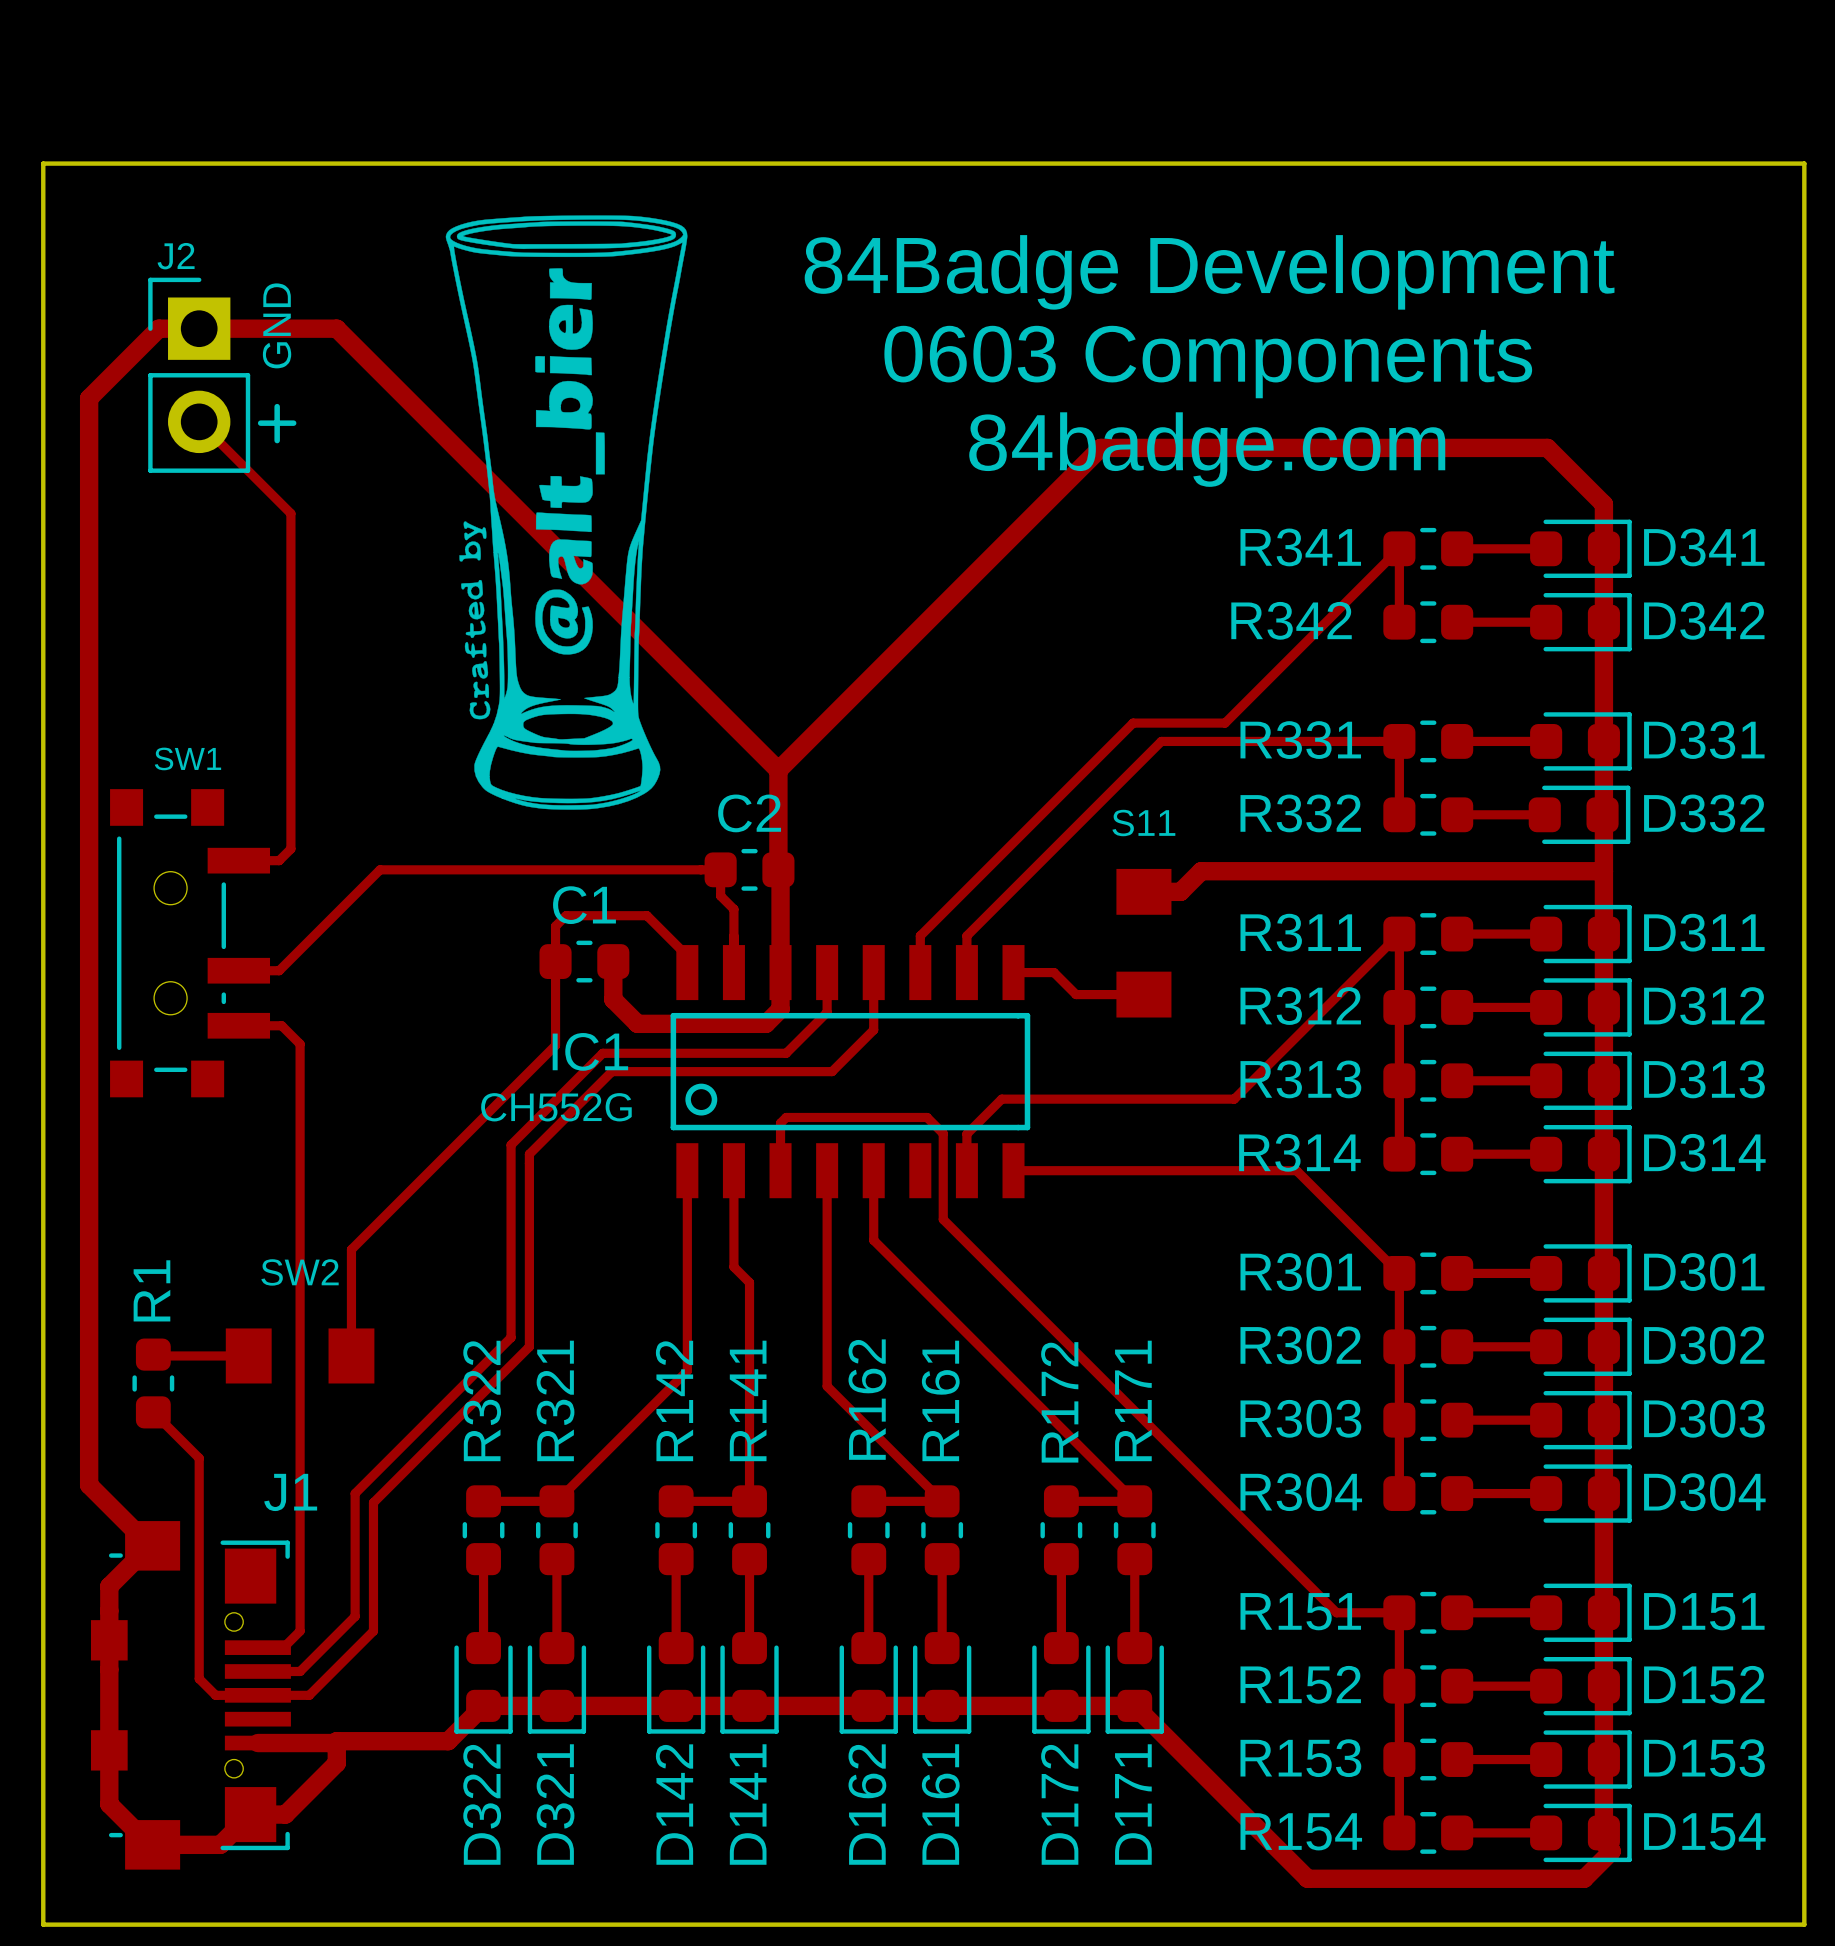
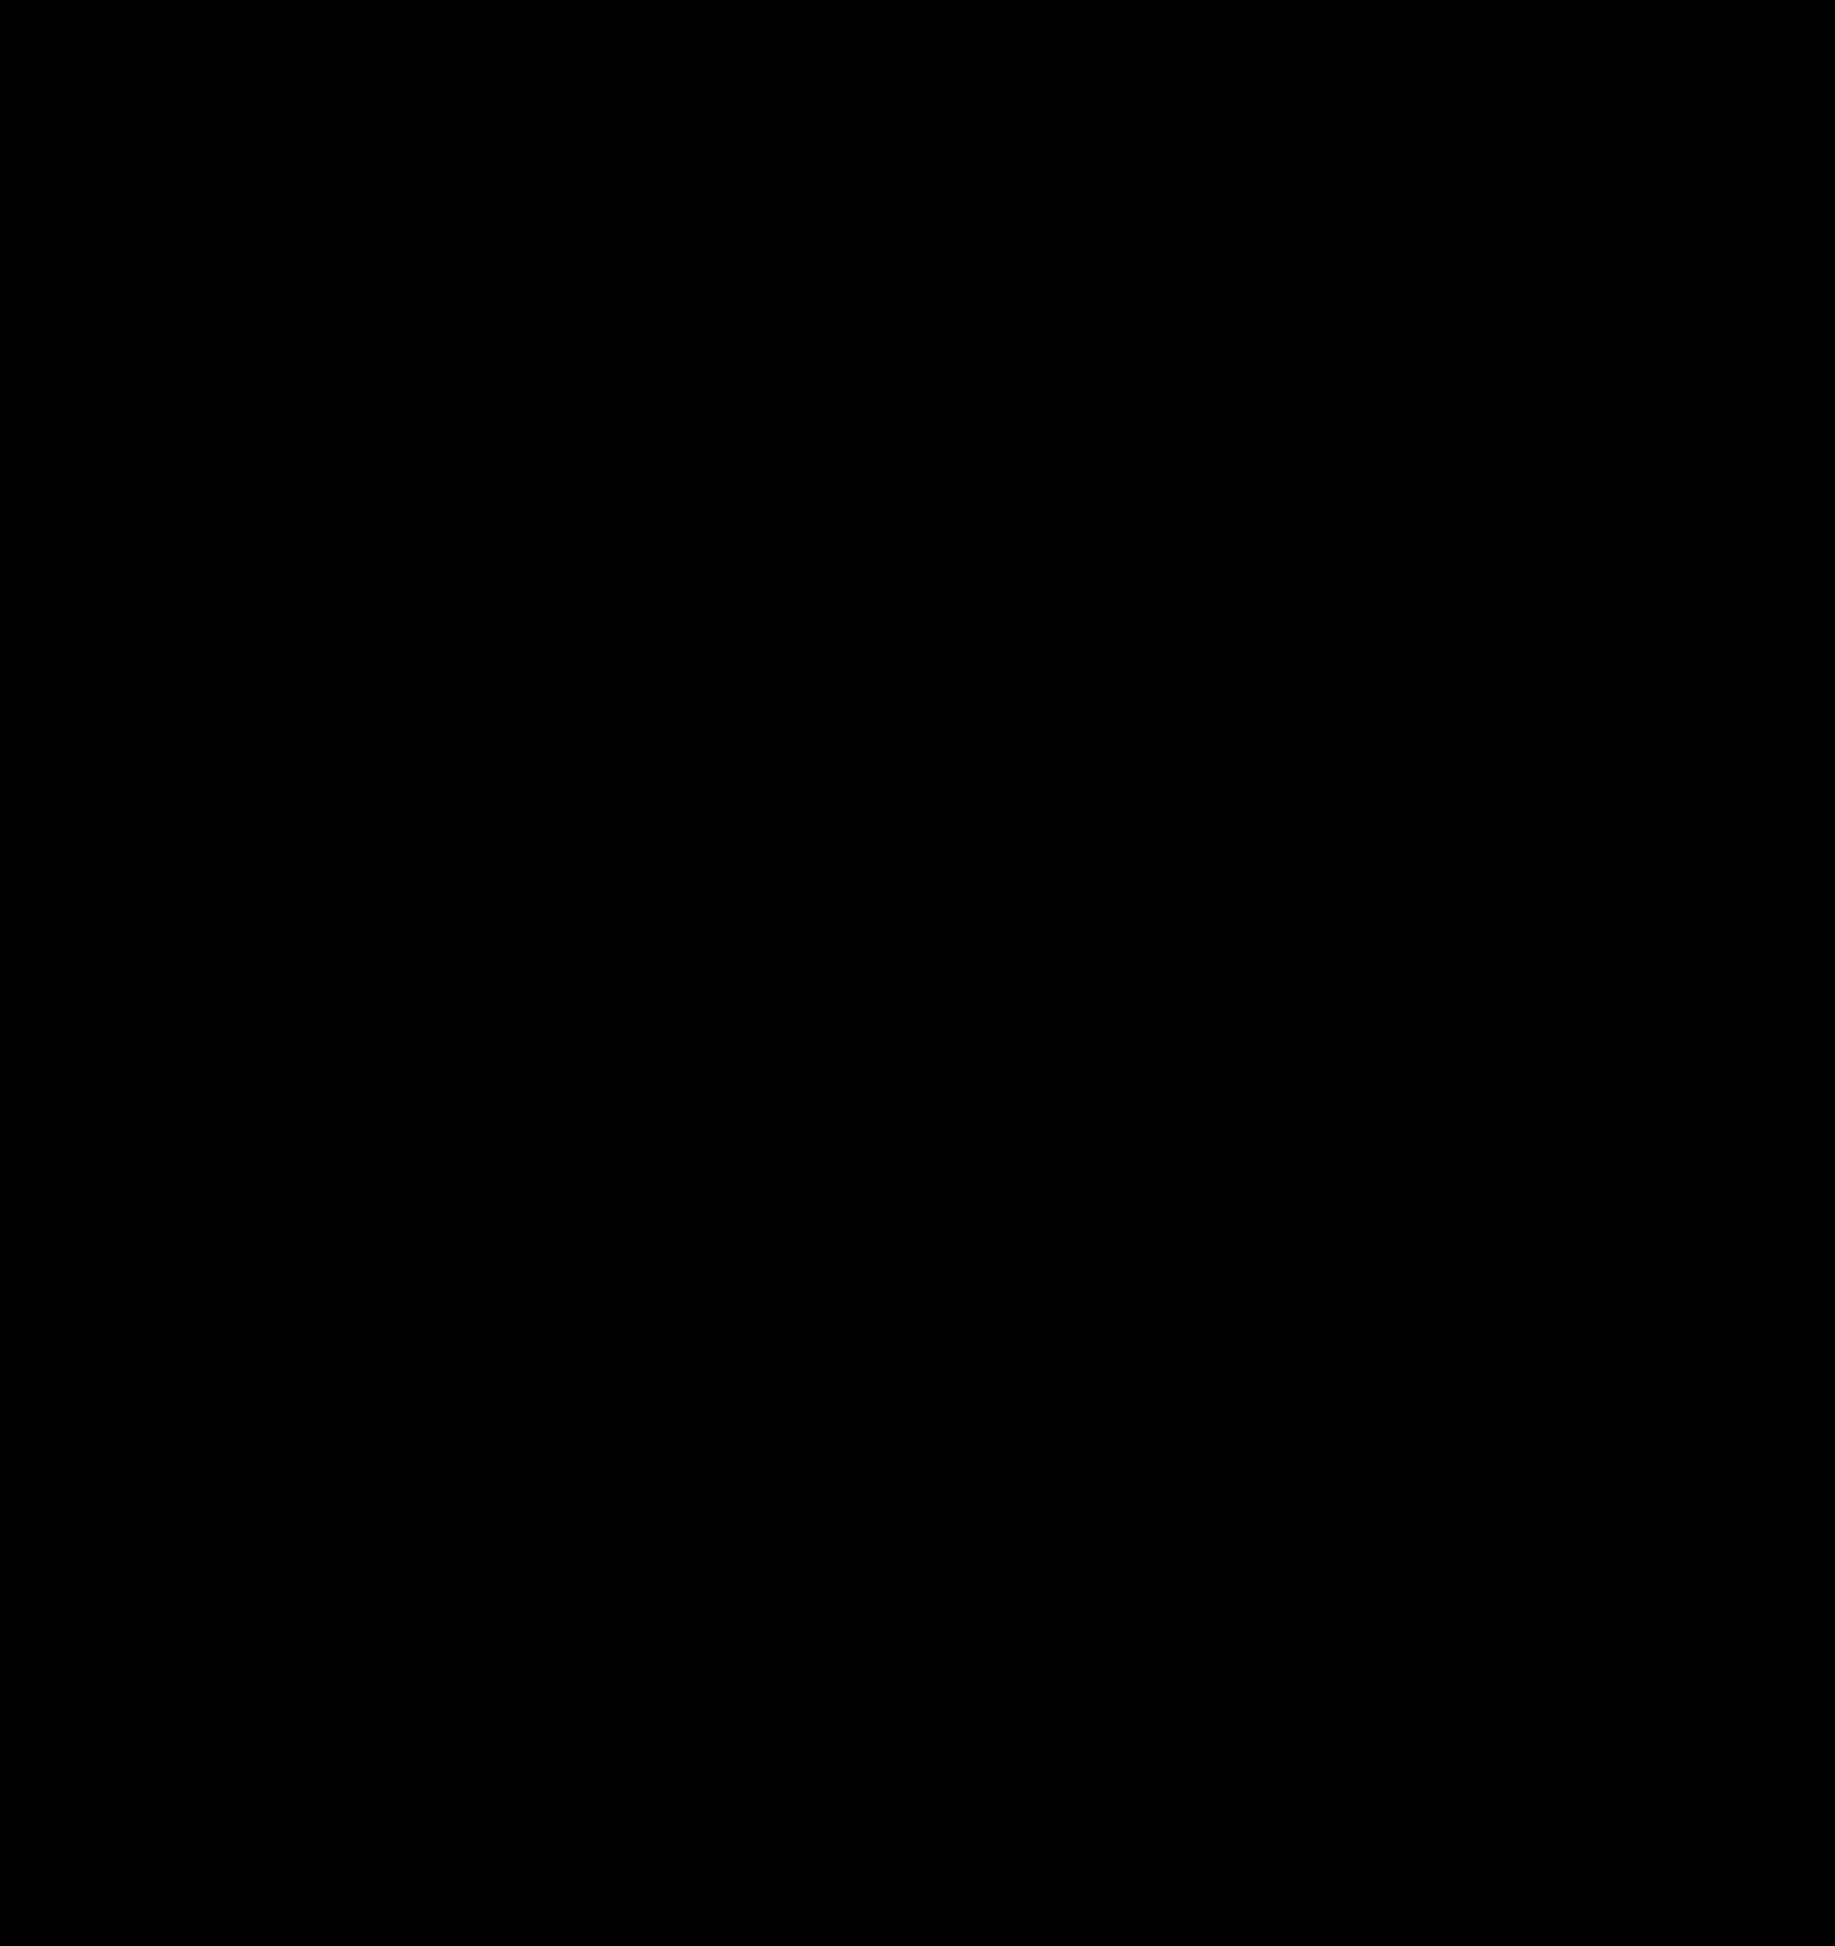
board edge: (43, 163) (1804, 163) (1804, 1924) (43, 1924) (43, 163) -> none
drawing: [445, 215, 688, 810] -> none
text: 84Badge Development (1209, 272) -> none
text: 0603 Components (1208, 362) -> none
J2: (222, 375) -> none
top track: (199, 421) (290, 513) (290, 848) (279, 860) (238, 860) -> none
text: 84badge.com (1207, 449) -> none
R341: (1428, 548) -> none
top track: (1457, 548) (1546, 548) -> none
D341: (1580, 548) -> none
top track: (1399, 622) (1399, 548) (1225, 723) (1133, 723) (920, 935) (920, 972) -> none
R342: (1428, 622) -> none
top track: (1457, 622) (1546, 622) -> none
D342: (1580, 622) -> none
R331: (1428, 741) -> none
top track: (1457, 741) (1546, 741) -> none
D331: (1580, 741) -> none
top track: (778, 770) (780, 1009) (765, 1023) (637, 1023) (613, 999) (613, 961) -> none
top track: (778, 770) (336, 328) (158, 328) (89, 398) (89, 1485) (149, 1545) -> none
top track: (778, 770) (1100, 447) (1547, 447) (1603, 504) (1603, 1843) (1611, 1851) (1584, 1878) (1307, 1878) (1134, 1705) (483, 1705) (448, 1741) (336, 1741) -> none
top track: (1399, 814) (1399, 741) (1161, 741) (966, 935) (966, 972) -> none
R332: (1428, 814) -> none
top track: (1457, 814) (1544, 814) -> none
D332: (1579, 814) -> none
C2: (749, 869) -> none
top track: (1603, 871) (1201, 871) (1180, 891) (1143, 891) -> none
R311: (1428, 934) -> none
top track: (1457, 934) (1546, 934) -> none
D311: (1580, 934) -> none
SW1: (190, 943) -> none
S11: (1143, 943) -> none
C1: (584, 961) -> none
top track: (238, 970) (279, 970) (380, 869) (720, 869) (720, 895) (733, 909) (733, 972) -> none
top track: (687, 972) (687, 956) (646, 915) (566, 915) (555, 926) (555, 1045) (351, 1249) (351, 1355) -> none
top track: (827, 972) (827, 1012) (786, 1053) (602, 1053) (511, 1145) (511, 1337) (355, 1493) (355, 1616) (300, 1671) (257, 1671) -> none
top track: (873, 972) (873, 1029) (832, 1071) (611, 1071) (529, 1154) (529, 1346) (373, 1502) (373, 1631) (309, 1695) (215, 1695) (199, 1678) (199, 1458) (153, 1412) -> none
top track: (1013, 972) (1054, 972) (1076, 994) (1143, 994) -> none
R312: (1428, 1007) -> none
top track: (1457, 1007) (1546, 1007) -> none
D312: (1580, 1007) -> none
top track: (238, 1025) (281, 1025) (300, 1044) (300, 1631) (283, 1647) (257, 1647) -> none
IC1: (850, 1071) -> none
R313: (1428, 1080) -> none
top track: (1457, 1080) (1546, 1080) -> none
D313: (1580, 1080) -> none
top track: (1399, 1154) (1399, 934) (1234, 1099) (1001, 1099) (966, 1134) (966, 1170) -> none
R314: (1428, 1154) -> none
top track: (1457, 1154) (1546, 1154) -> none
D314: (1580, 1154) -> none
top track: (687, 1170) (687, 1370) (556, 1501) (483, 1501) -> none
top track: (733, 1170) (733, 1266) (749, 1282) (749, 1501) (676, 1501) -> none
top track: (780, 1170) (780, 1123) (786, 1117) (927, 1117) (943, 1133) (943, 1219) (1336, 1612) (1399, 1612) (1399, 1832) -> none
top track: (827, 1170) (827, 1386) (942, 1501) (868, 1501) -> none
top track: (873, 1170) (873, 1240) (1134, 1501) (1061, 1501) -> none
top track: (1013, 1170) (1296, 1170) (1399, 1273) (1399, 1493) -> none
R301: (1428, 1273) -> none
top track: (1457, 1273) (1546, 1273) -> none
D301: (1580, 1273) -> none
R302: (1428, 1346) -> none
top track: (1457, 1346) (1546, 1346) -> none
D302: (1580, 1346) -> none
top track: (153, 1354) (248, 1355) -> none
SW2: (300, 1355) -> none
R1: (153, 1383) -> none
R303: (1428, 1420) -> none
top track: (1457, 1420) (1546, 1420) -> none
D303: (1580, 1420) -> none
R304: (1428, 1493) -> none
top track: (1457, 1493) (1546, 1493) -> none
D304: (1580, 1493) -> none
R322: (483, 1530) -> none
R321: (556, 1530) -> none
R142: (676, 1530) -> none
R141: (749, 1530) -> none
R162: (868, 1530) -> none
R161: (942, 1530) -> none
R172: (1061, 1530) -> none
R171: (1134, 1530) -> none
top track: (149, 1545) (109, 1586) (109, 1804) (149, 1844) (220, 1844) (250, 1814) (285, 1814) (336, 1763) (336, 1741) -> none
top track: (483, 1559) (483, 1648) -> none
top track: (556, 1559) (556, 1648) -> none
top track: (676, 1559) (676, 1648) -> none
top track: (749, 1559) (749, 1648) -> none
top track: (868, 1559) (868, 1648) -> none
top track: (942, 1559) (942, 1648) -> none
top track: (1061, 1559) (1061, 1648) -> none
top track: (1134, 1559) (1134, 1648) -> none
R151: (1428, 1612) -> none
top track: (1457, 1612) (1546, 1612) -> none
D151: (1580, 1612) -> none
D322: (483, 1682) -> none
D321: (556, 1682) -> none
D142: (676, 1682) -> none
D141: (749, 1682) -> none
D162: (868, 1682) -> none
D161: (942, 1682) -> none
D172: (1061, 1682) -> none
D171: (1134, 1682) -> none
R152: (1428, 1686) -> none
top track: (1457, 1686) (1546, 1686) -> none
D152: (1580, 1686) -> none
J1: (190, 1695) -> none
top track: (336, 1741) (334, 1743) (257, 1743) -> none
R153: (1428, 1759) -> none
top track: (1457, 1759) (1546, 1759) -> none
D153: (1580, 1759) -> none
R154: (1428, 1832) -> none
top track: (1457, 1832) (1546, 1832) -> none
D154: (1580, 1832) -> none

